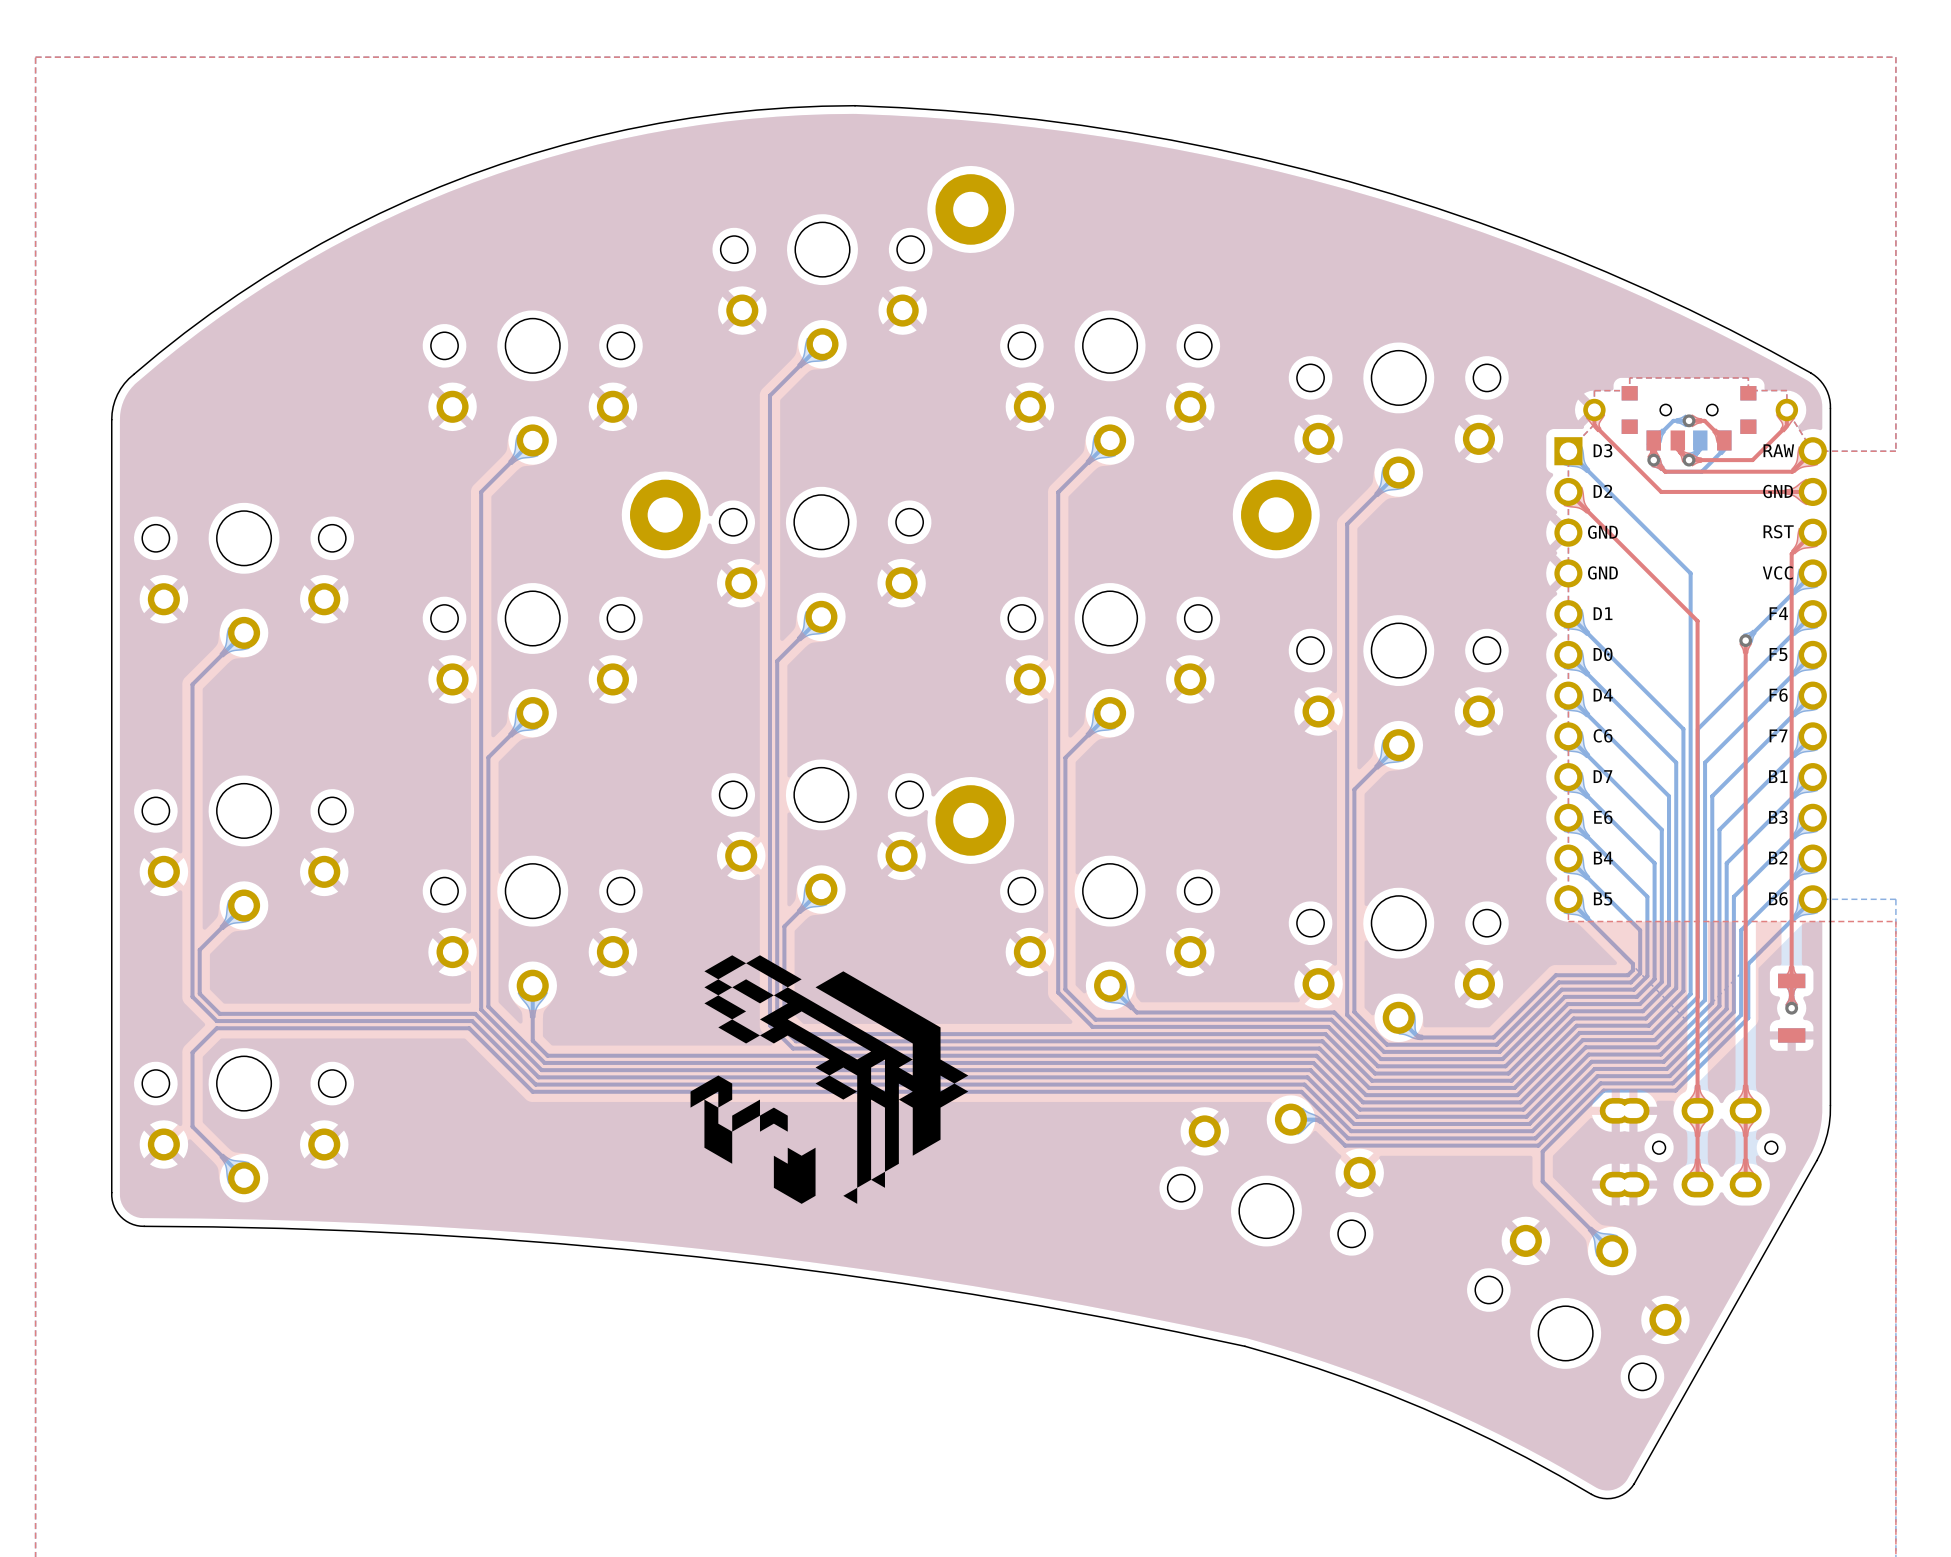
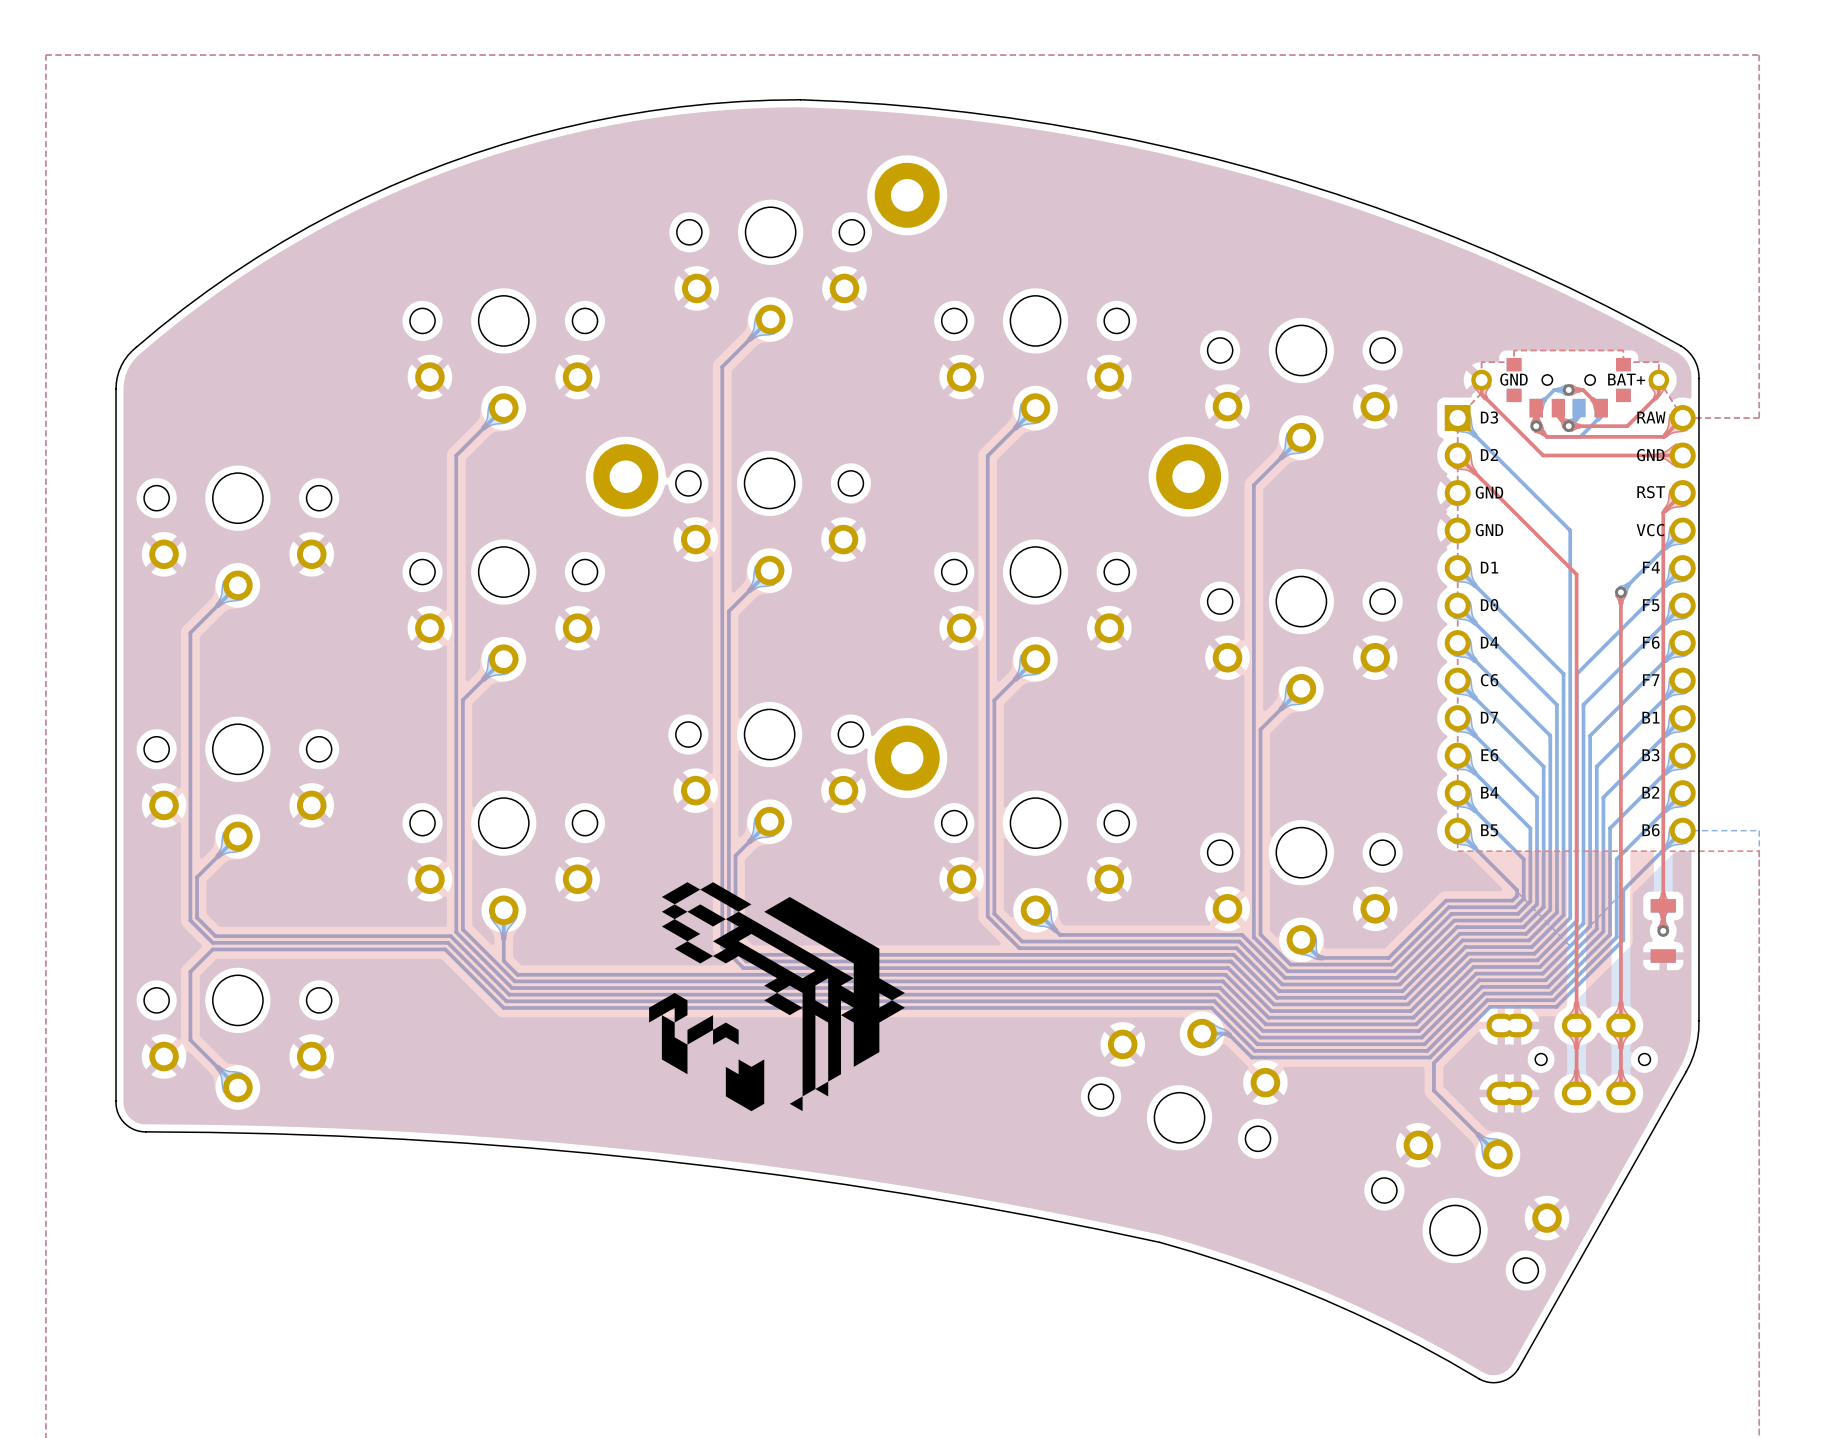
text: none -> GND (1513, 379)
text: none -> BAT+ (1626, 379)

